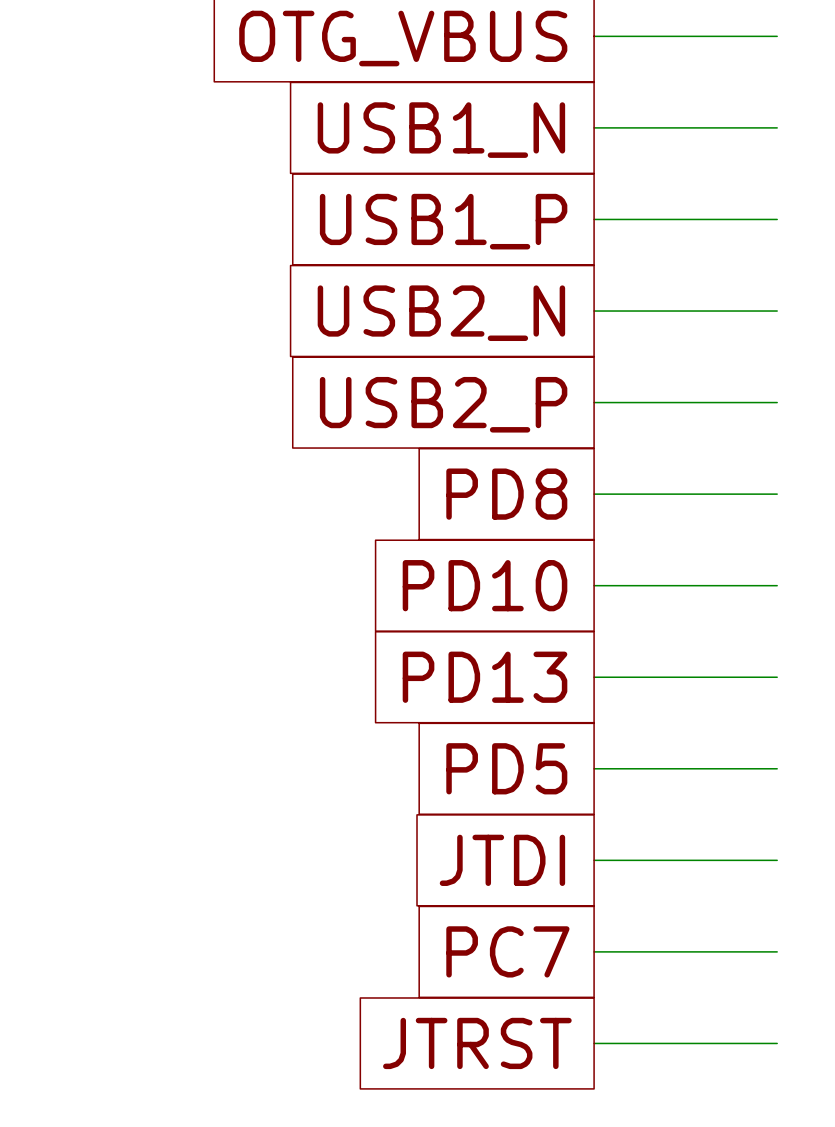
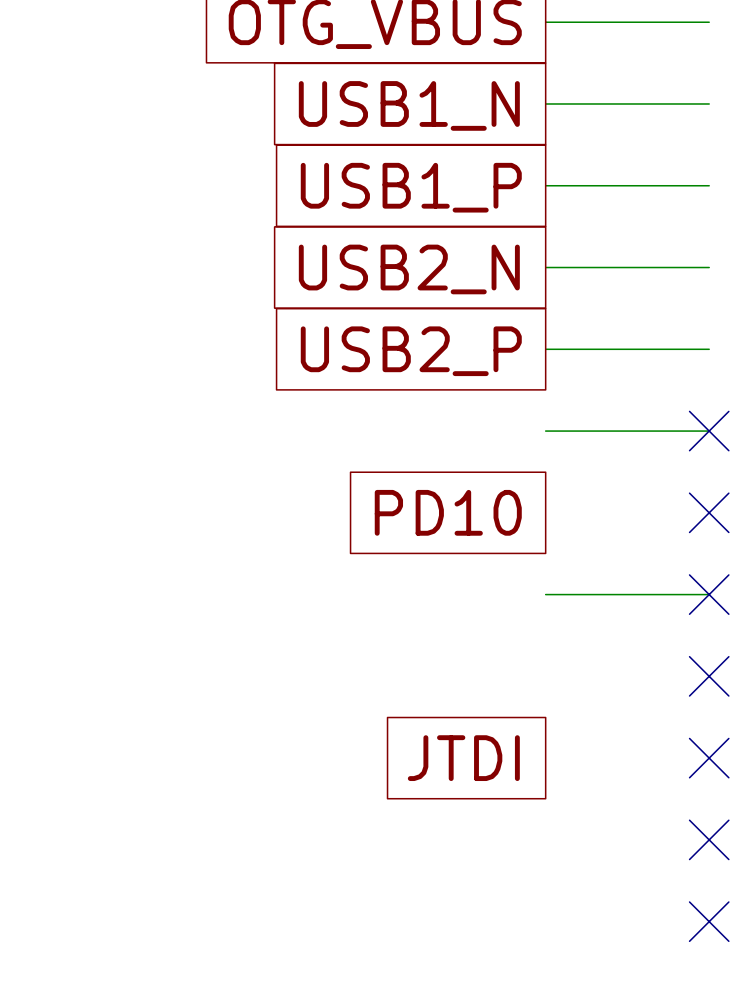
global label: PD8 (506, 494) -> none
no-connect mark: none -> (709, 431)
wire: (594, 585) (777, 585) -> none
no-connect mark: none -> (709, 512)
global label: PD13 (485, 677) -> none
no-connect mark: none -> (709, 594)
global label: PD5 (506, 768) -> none
wire: (594, 768) (777, 768) -> none
no-connect mark: none -> (709, 676)
wire: (594, 860) (777, 860) -> none
no-connect mark: none -> (709, 758)
global label: PC7 (507, 951) -> none
wire: (594, 951) (777, 951) -> none
no-connect mark: none -> (709, 839)
global label: JTRST (477, 1043) -> none
wire: (594, 1043) (777, 1043) -> none
no-connect mark: none -> (709, 921)

